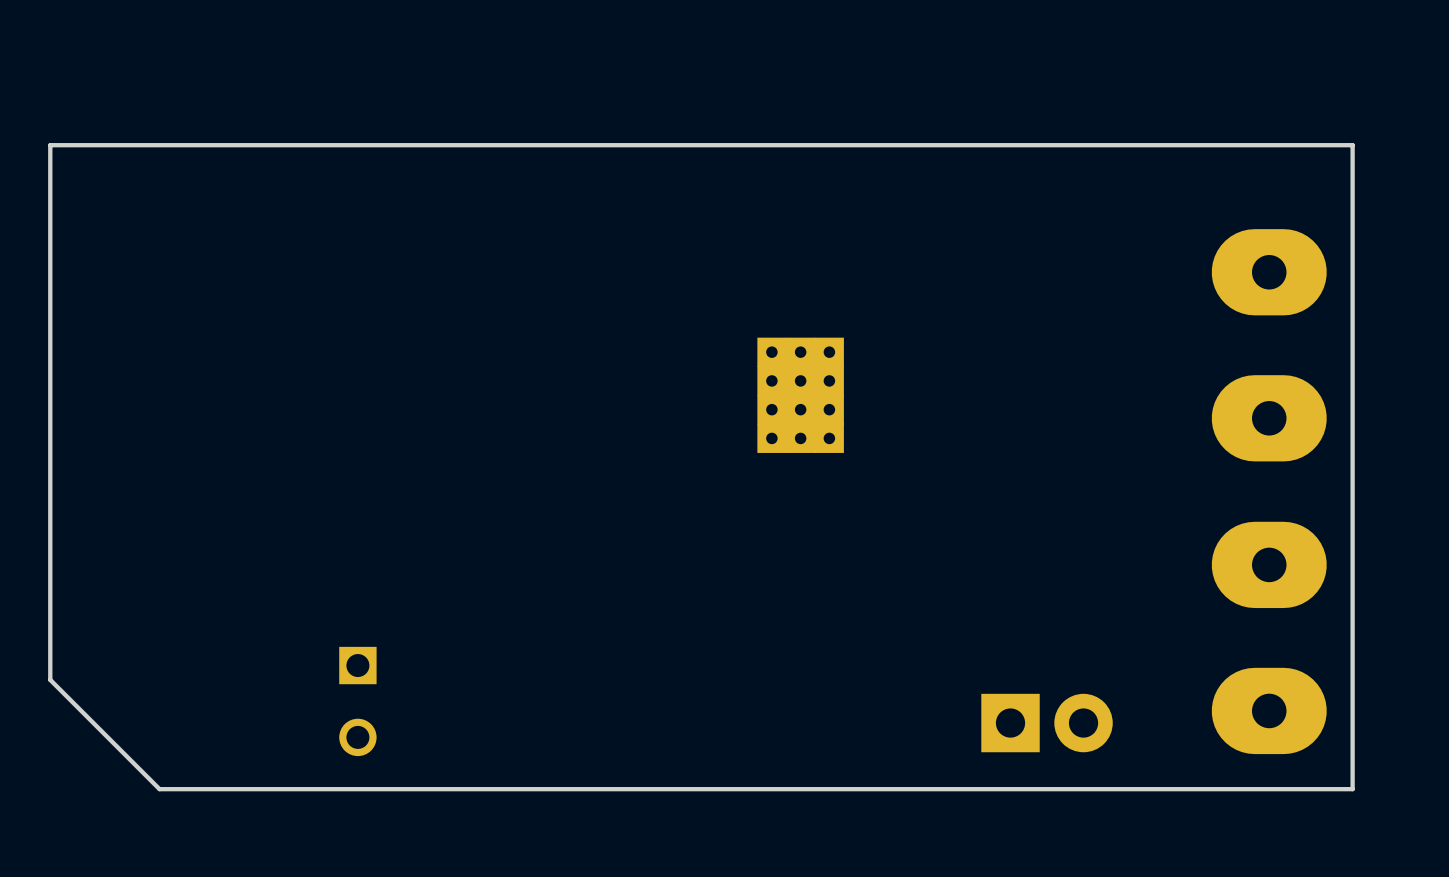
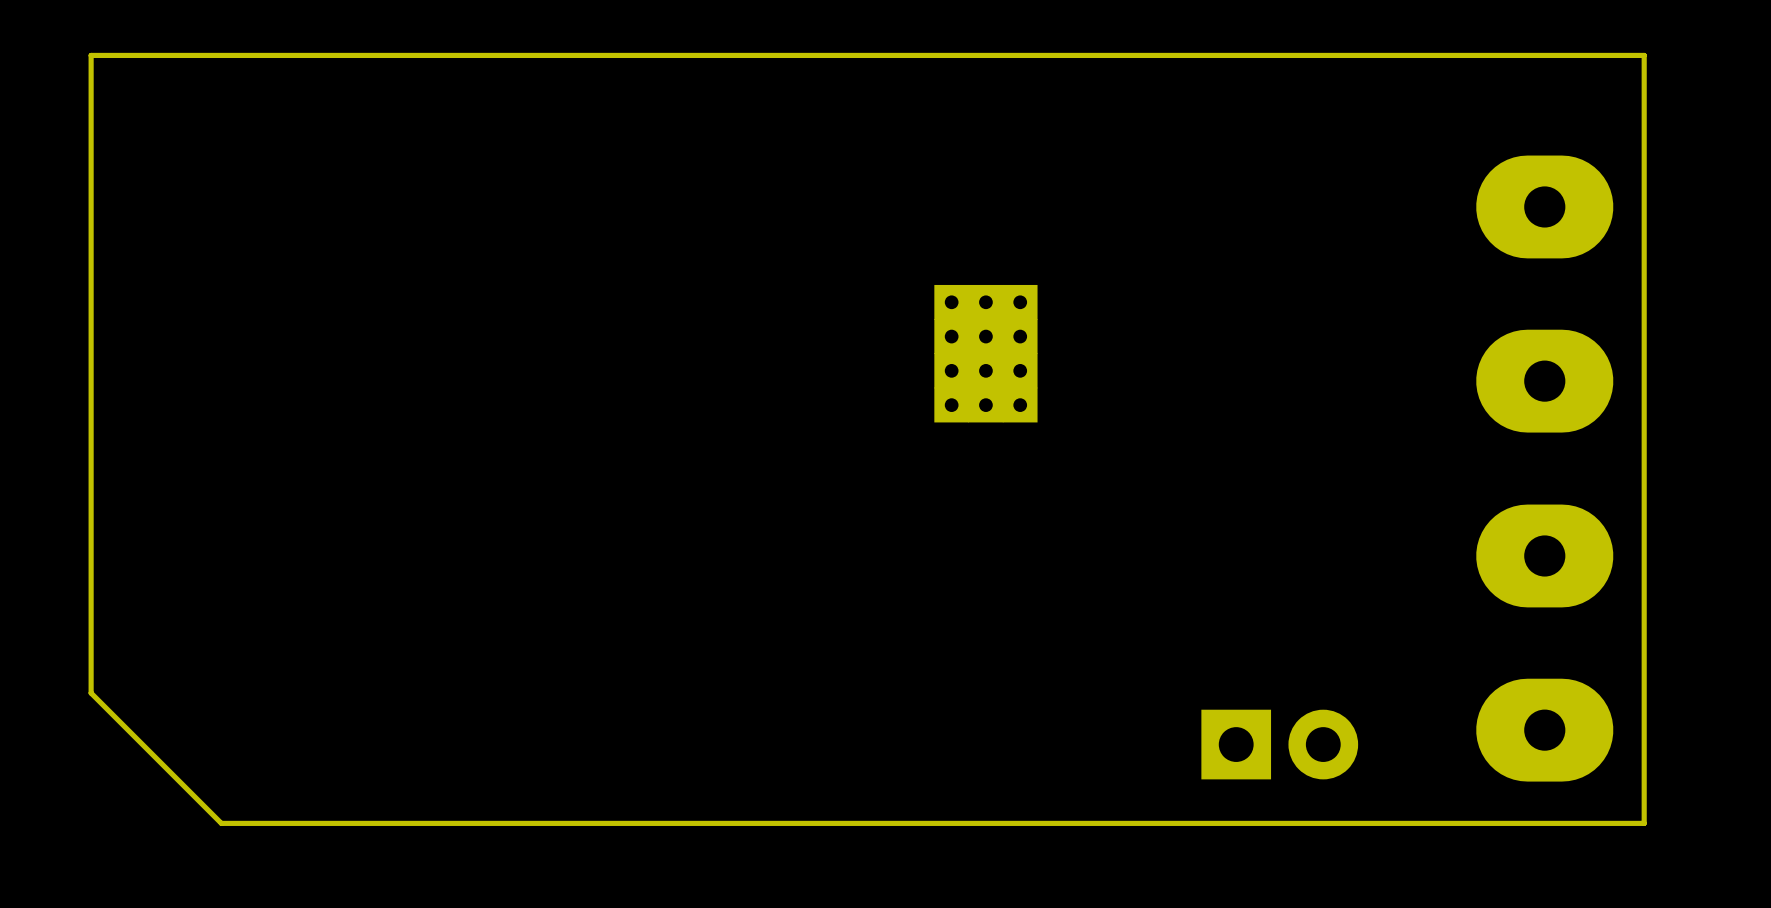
part: (357, 701) -> none

